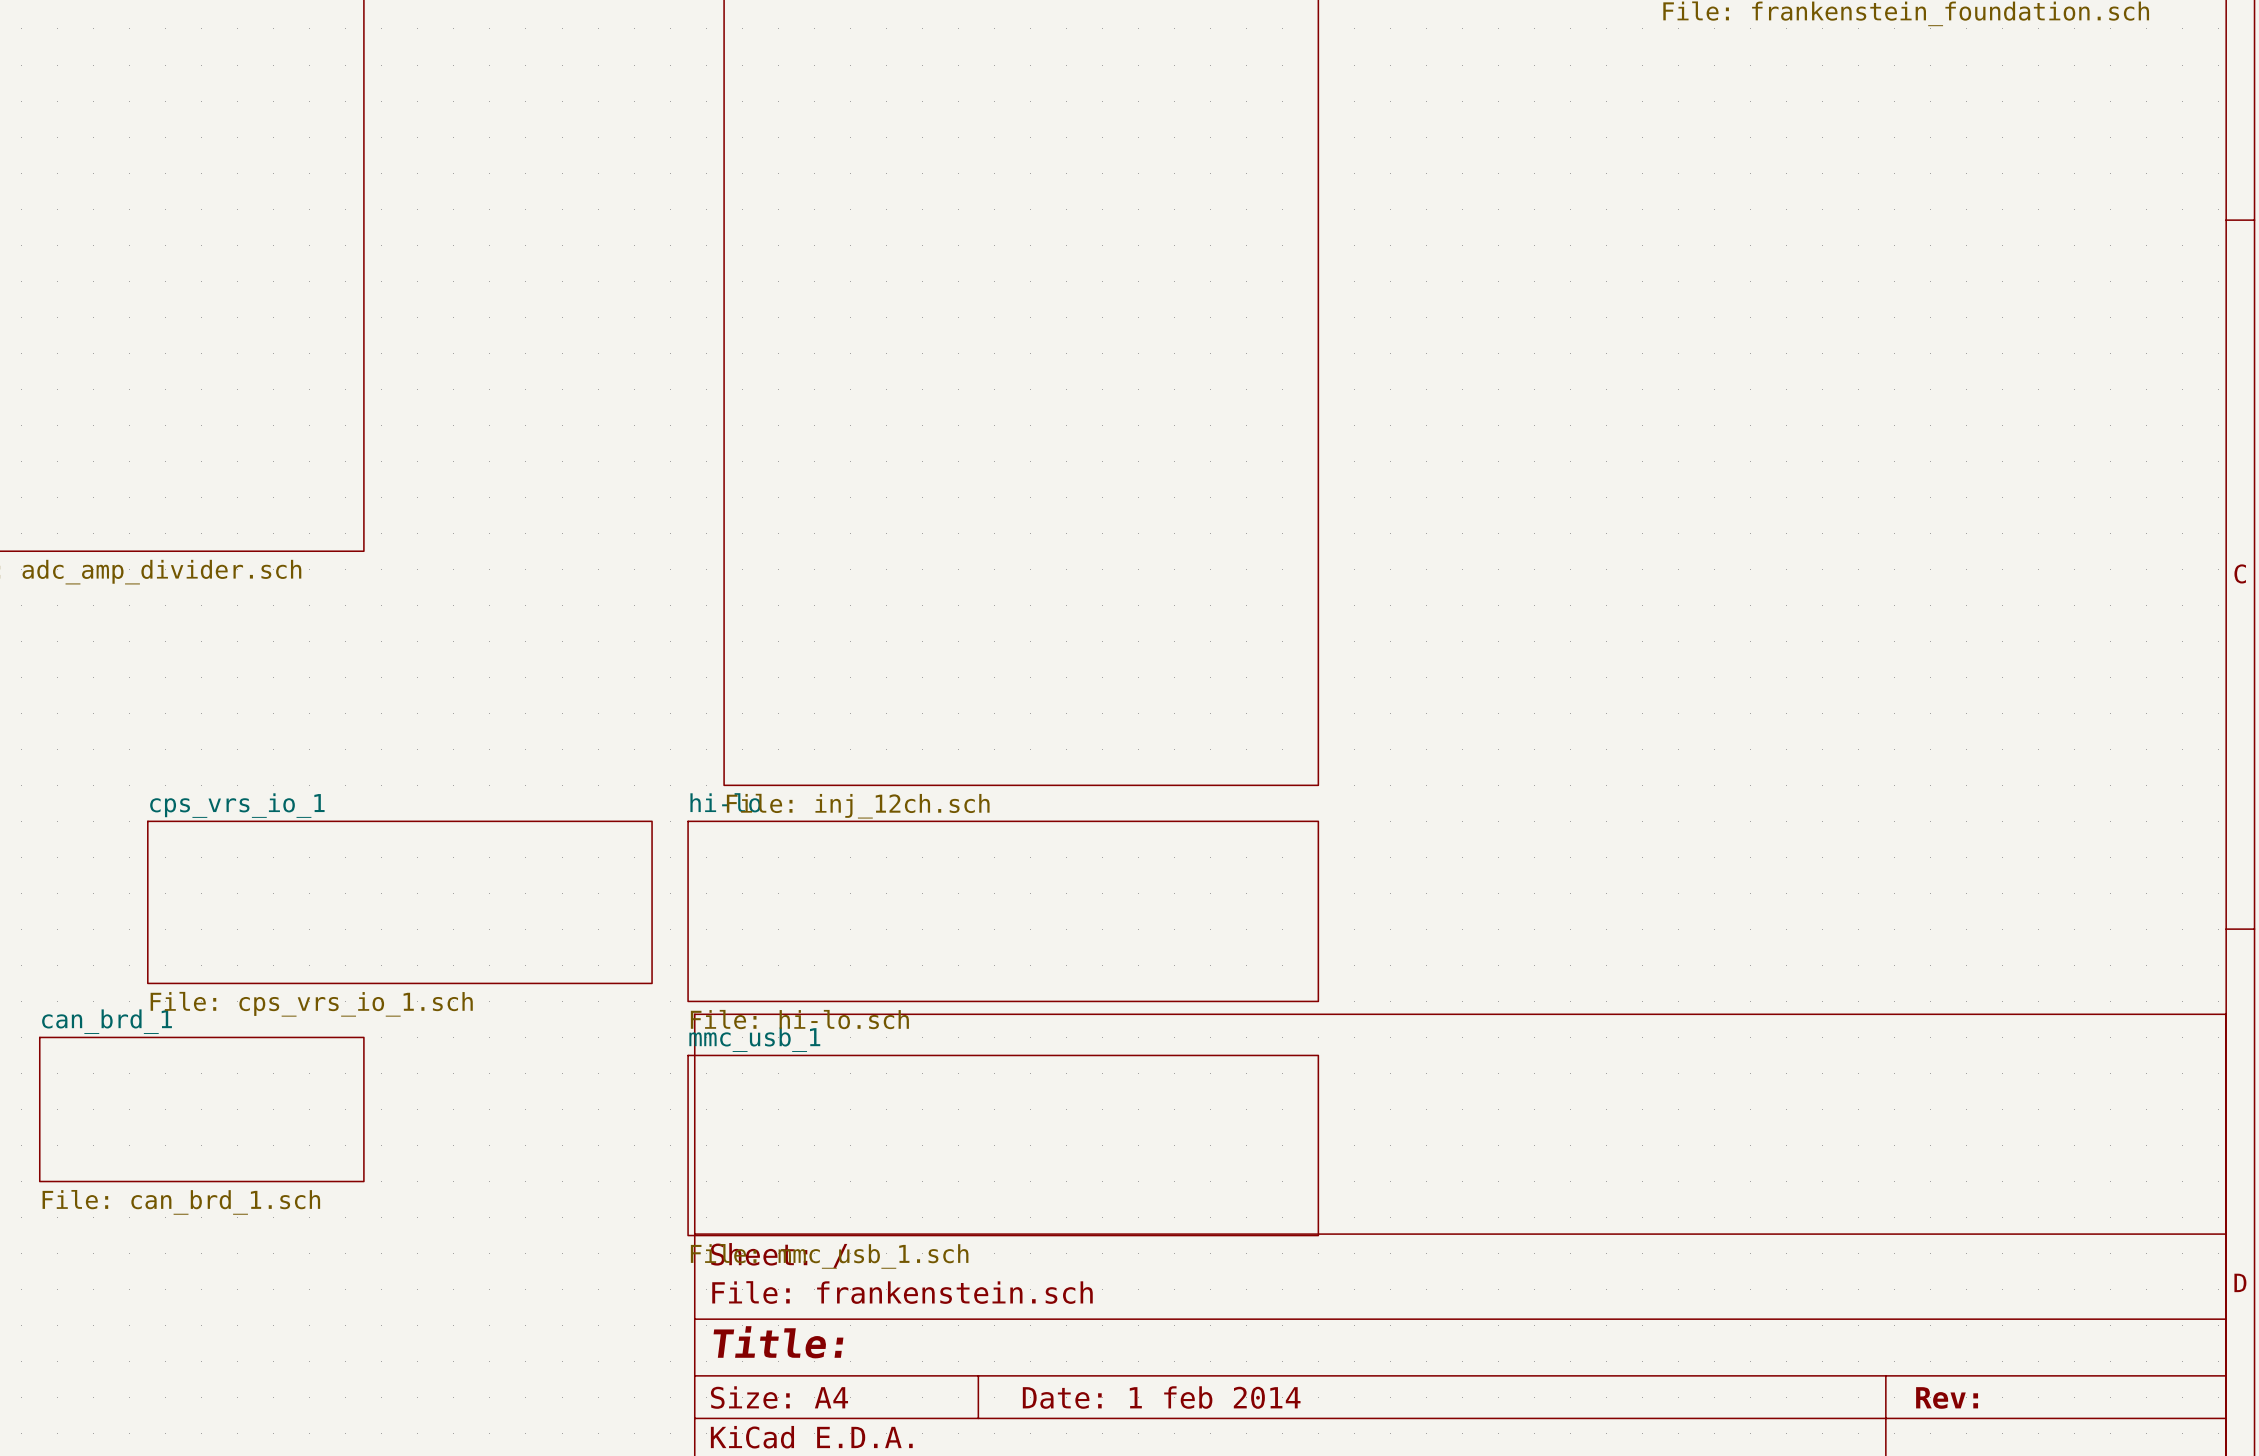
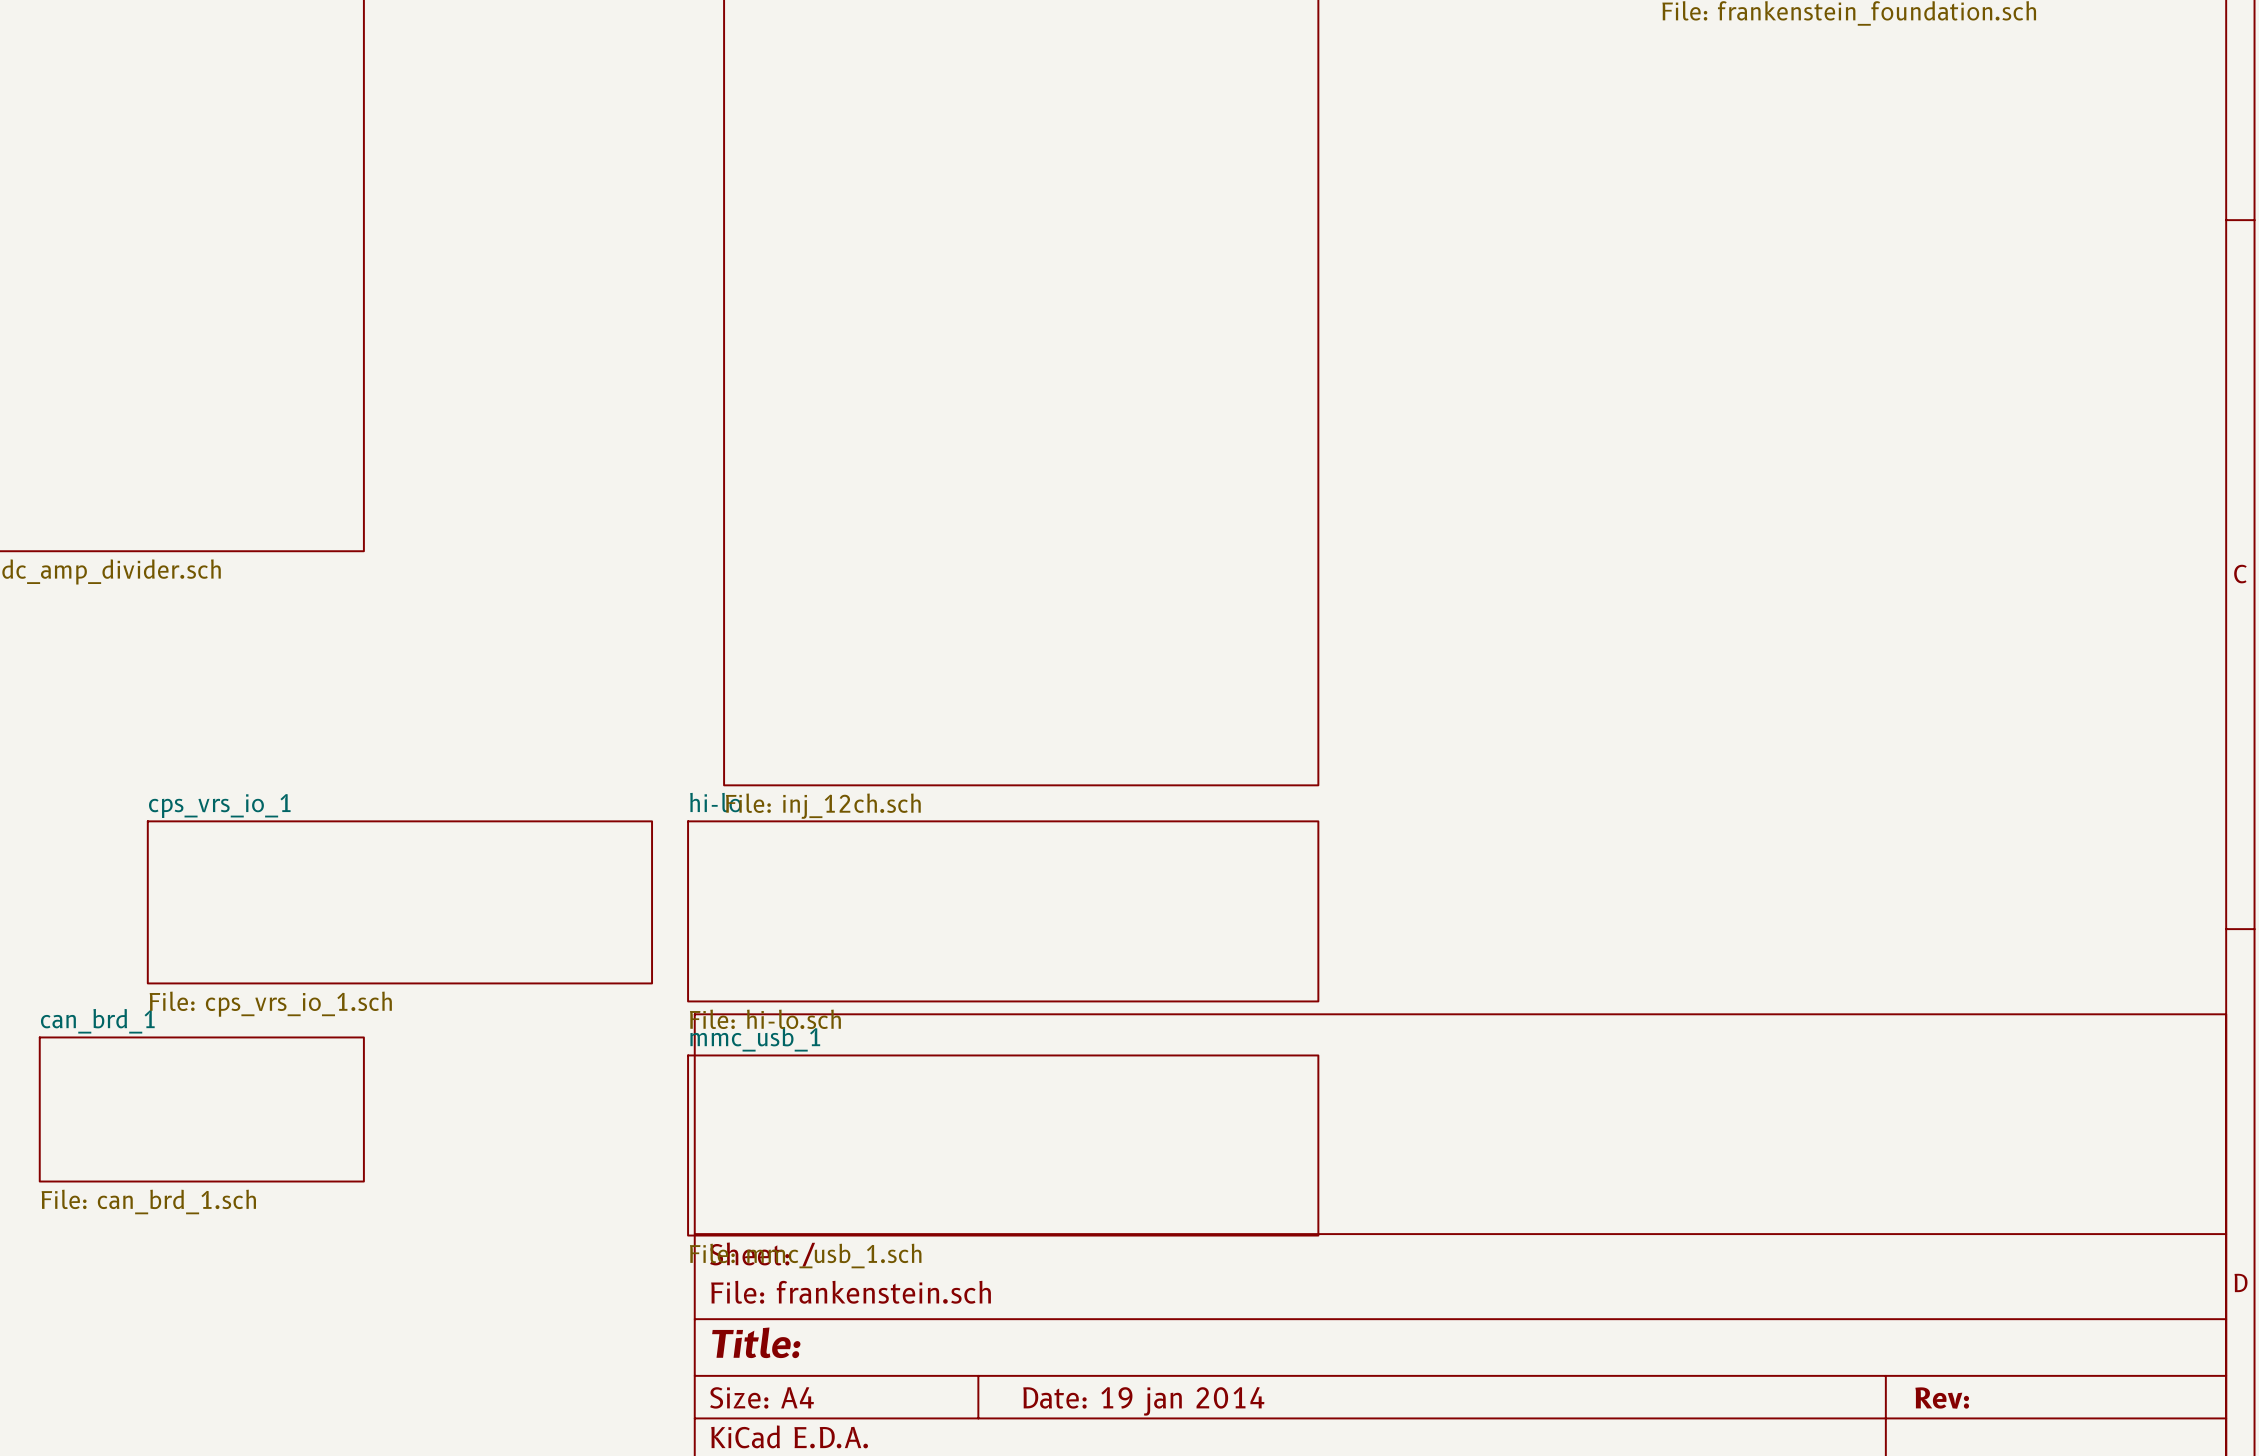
title block: Date: 1 feb 2014 (1161, 1397) -> Date: 19 jan 2014 (1143, 1401)

